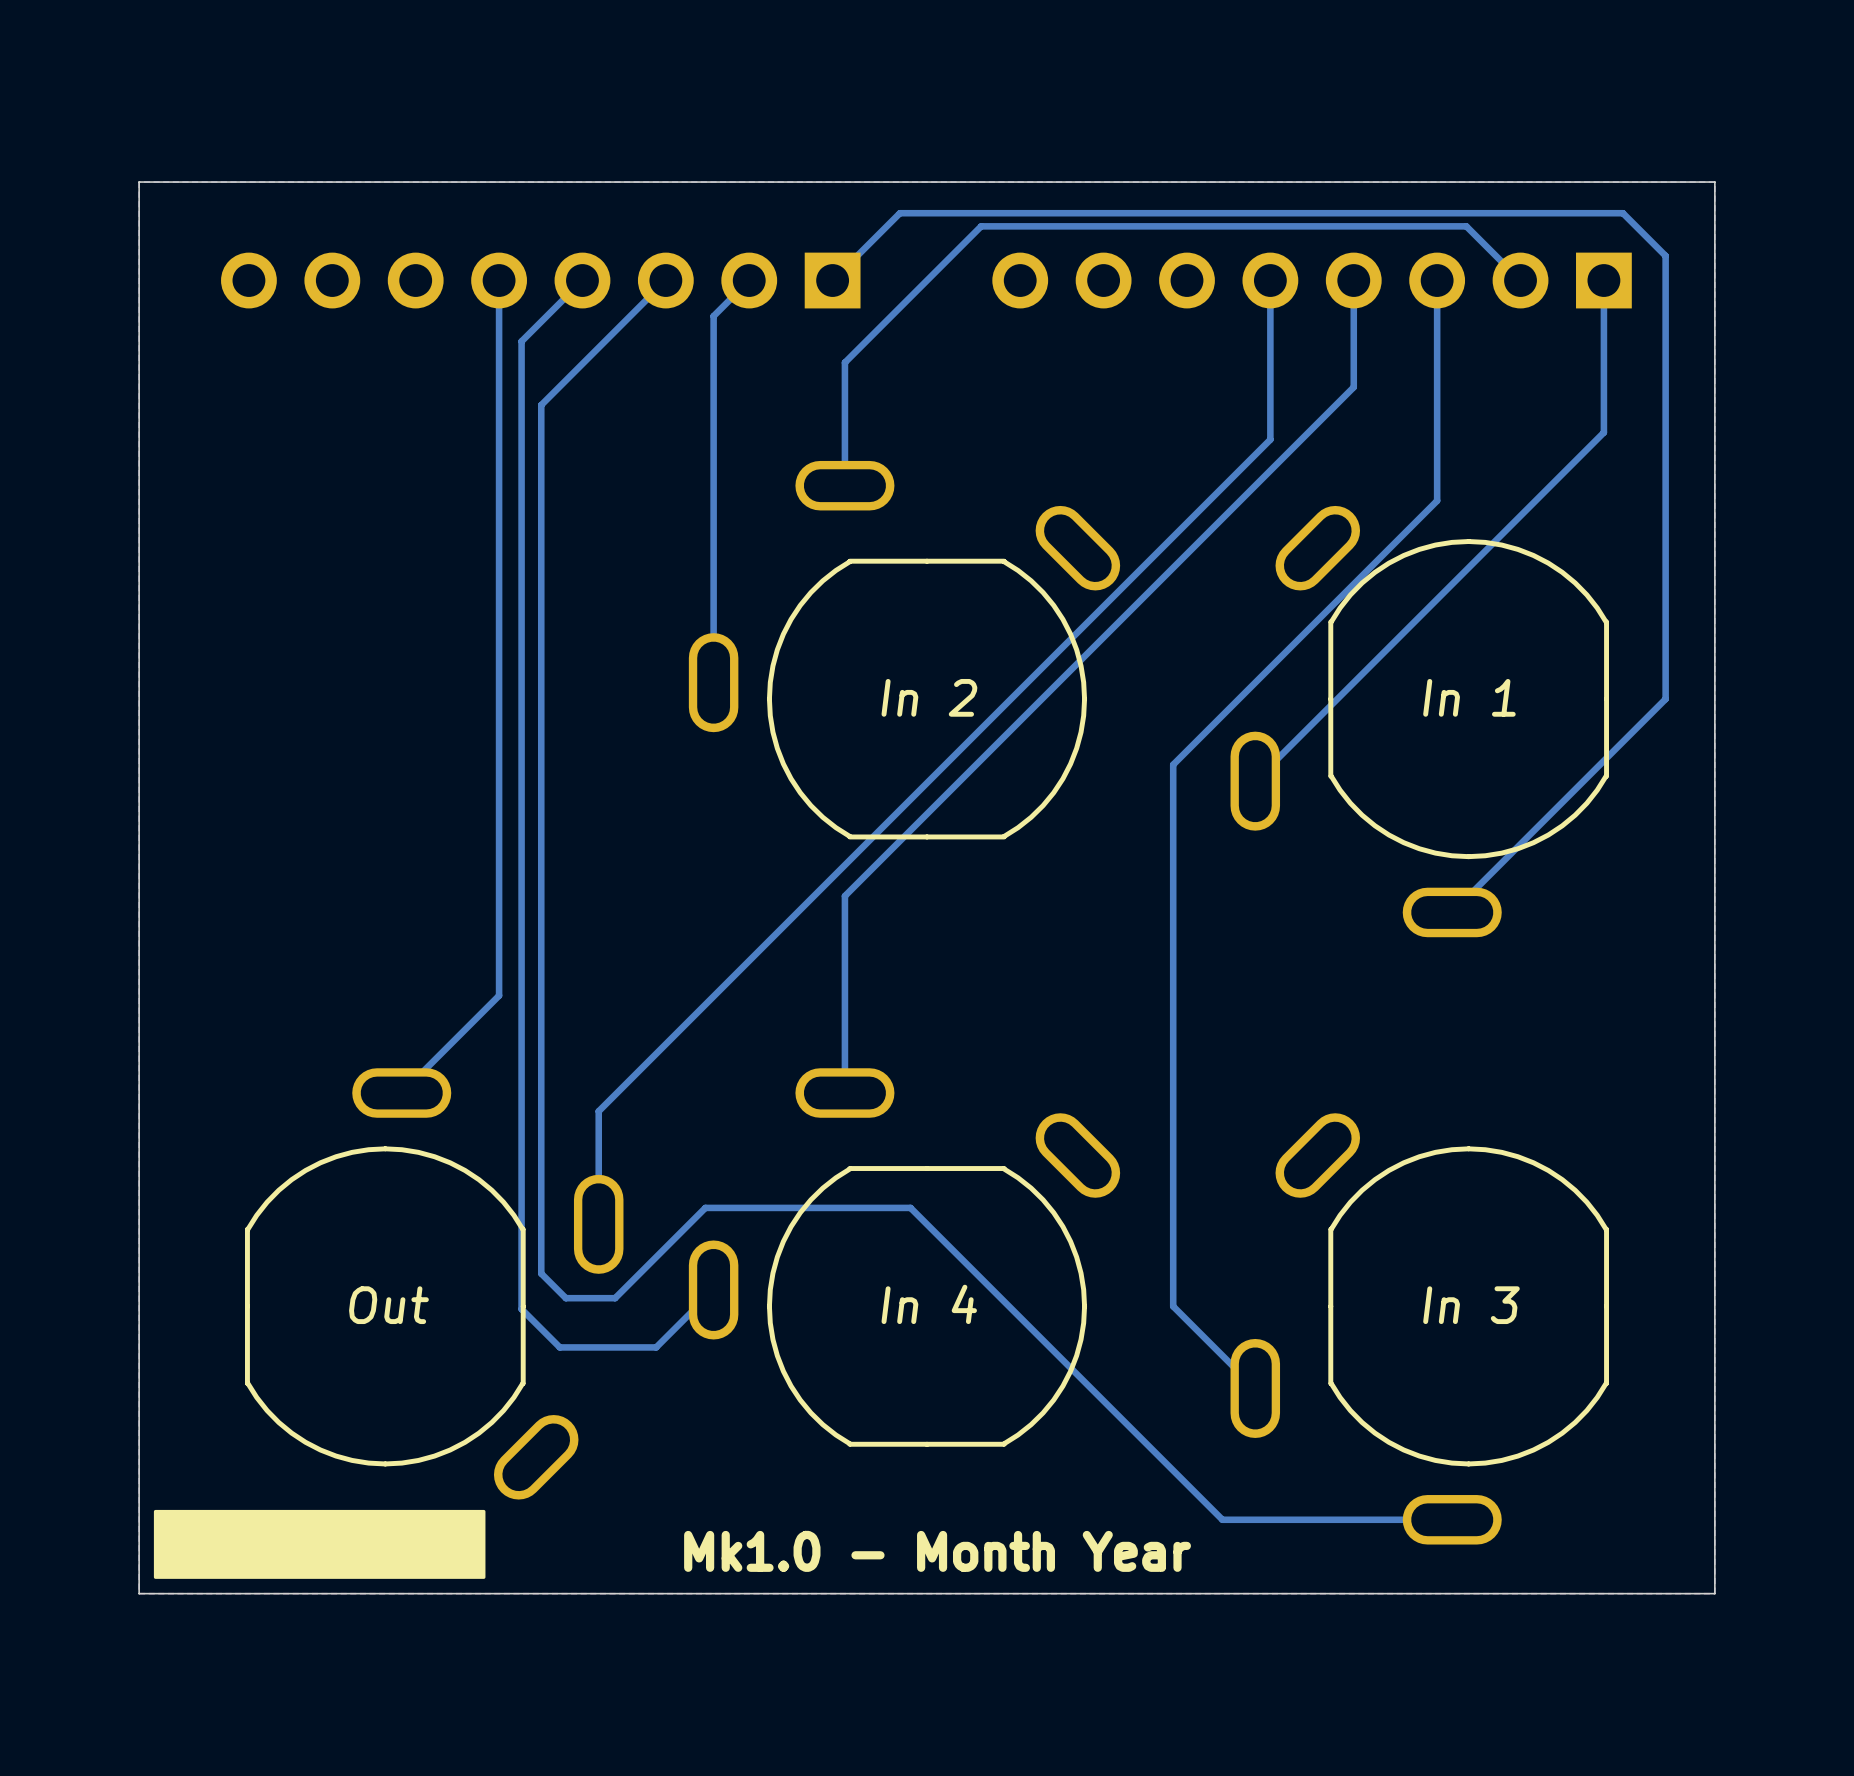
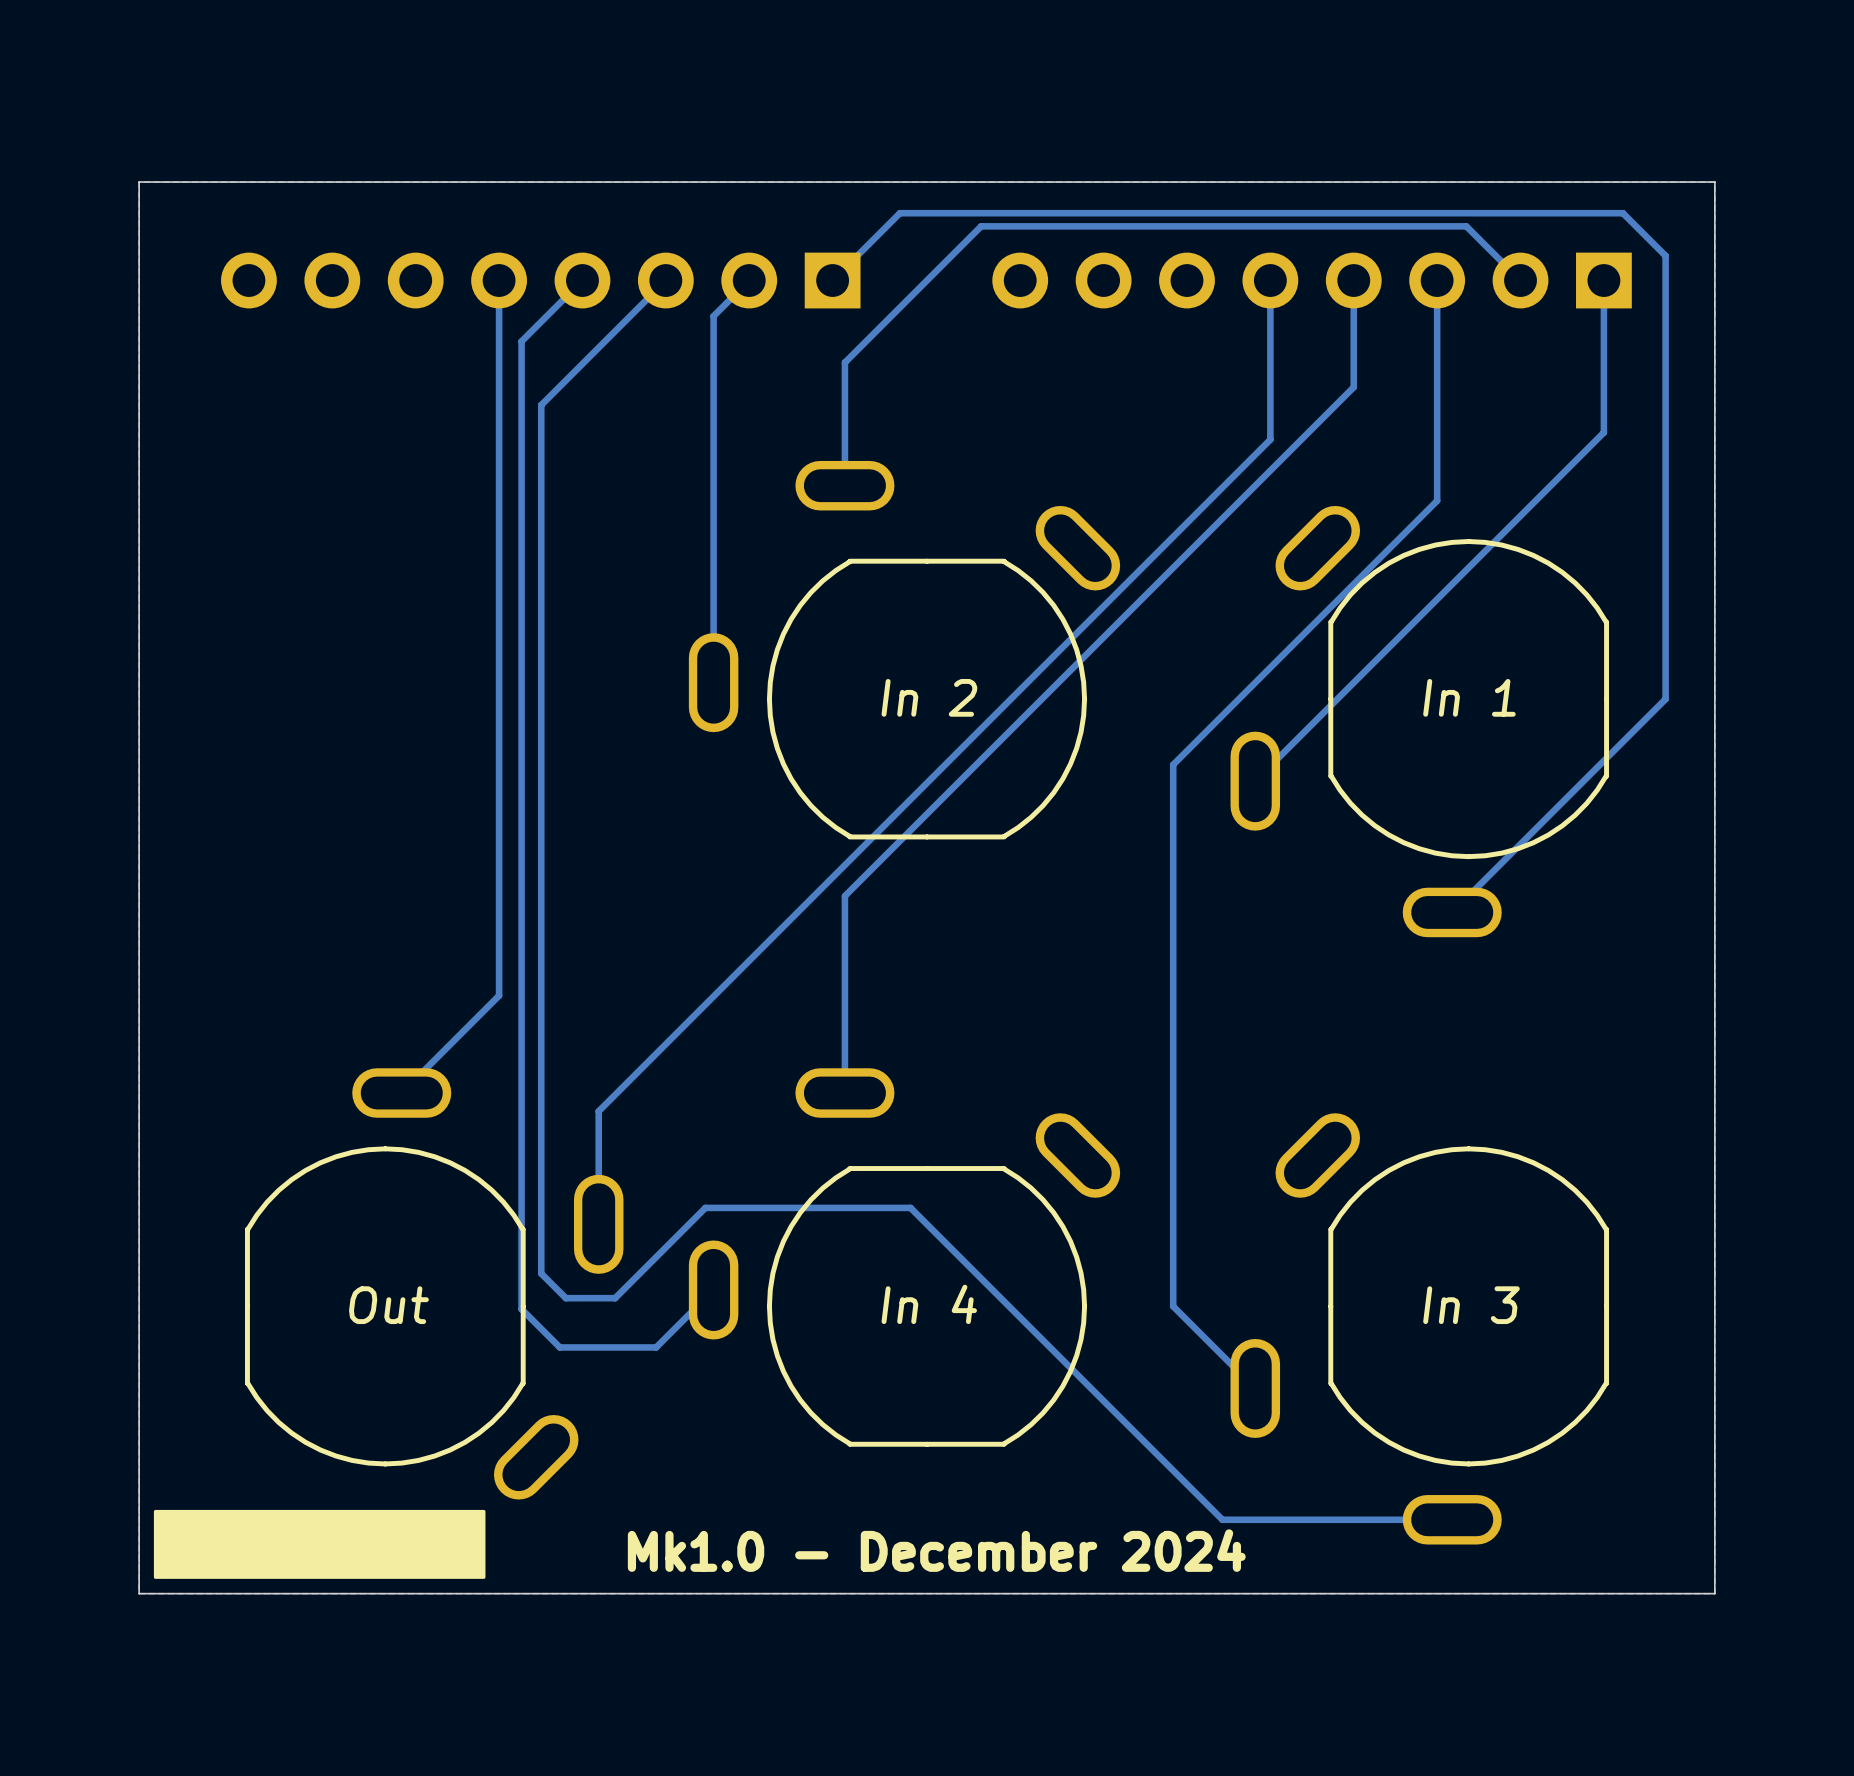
text: Mk1.0 - Month Year (937, 1551) -> Mk1.0 - December 2024 (936, 1550)

